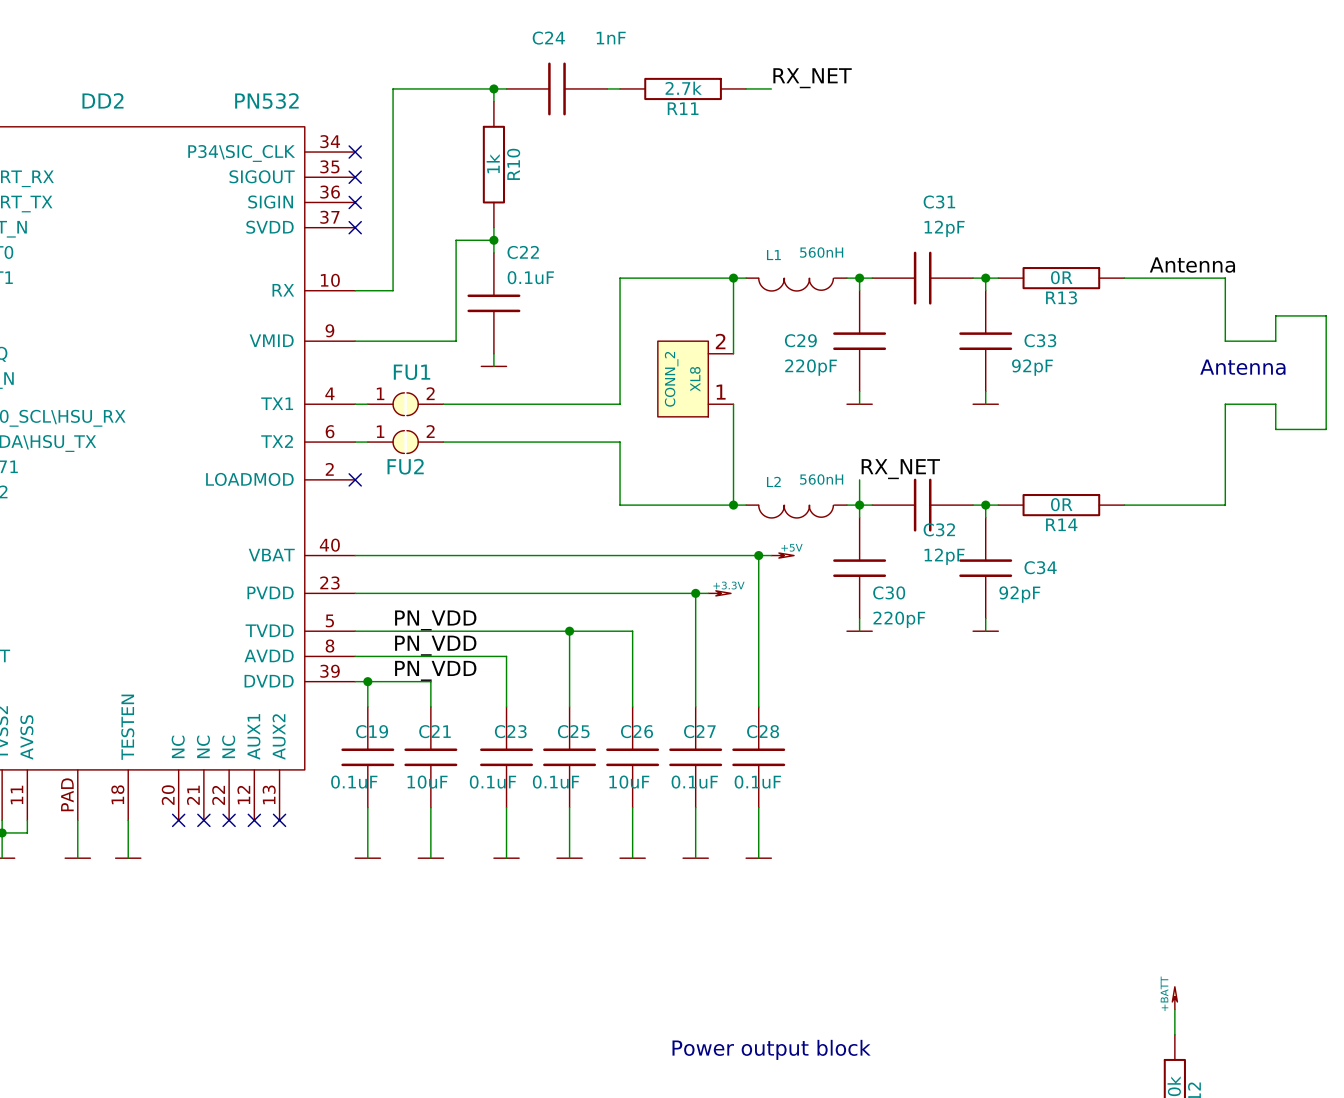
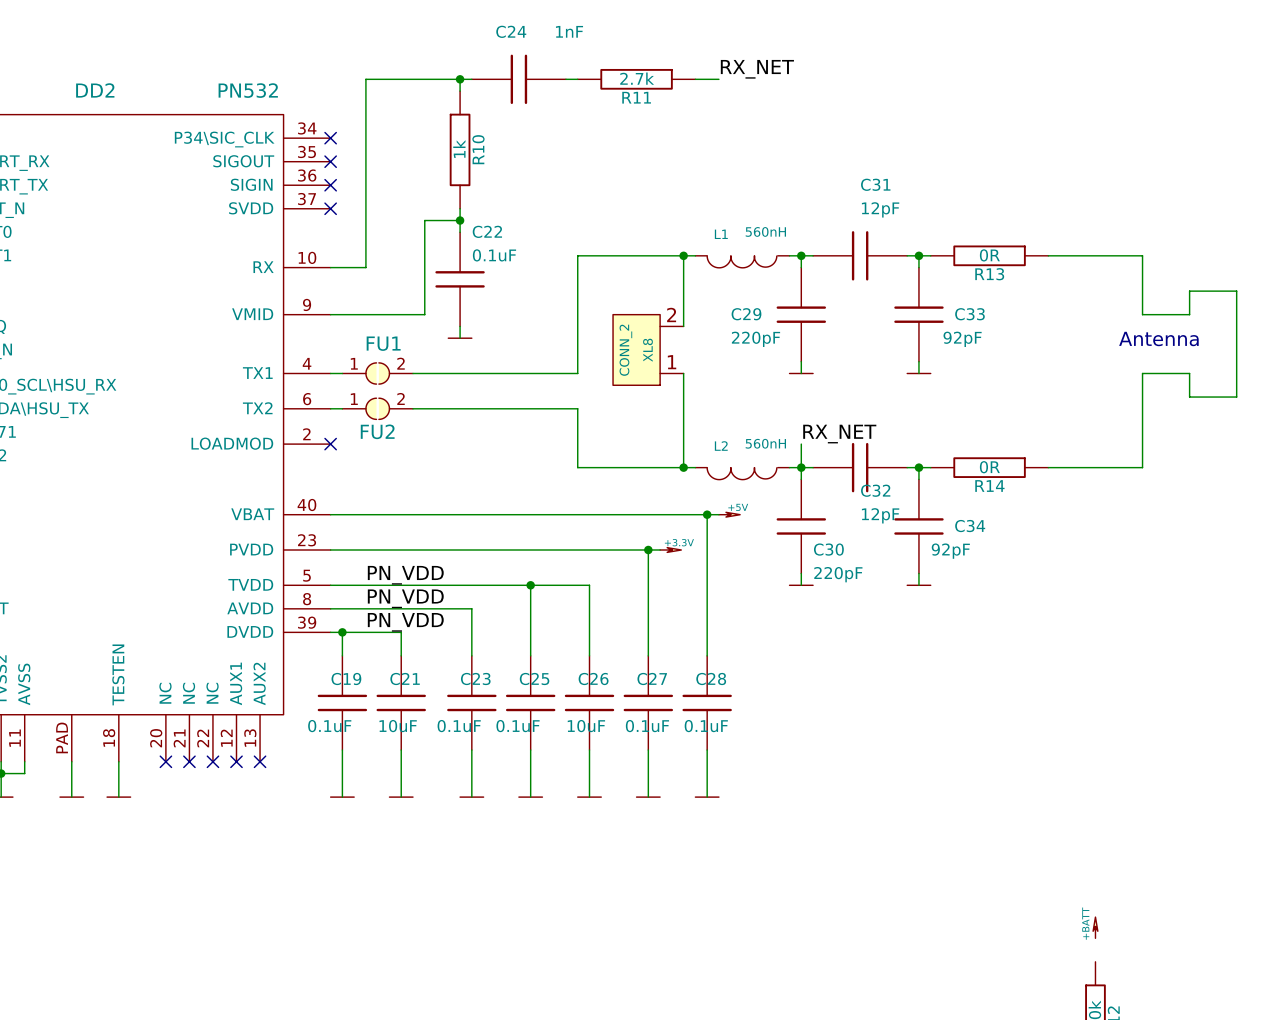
label: Antenna (1192, 265) -> none
wire: (1174, 1009) (1174, 1034) -> none
text: Power output block (771, 1049) -> none

